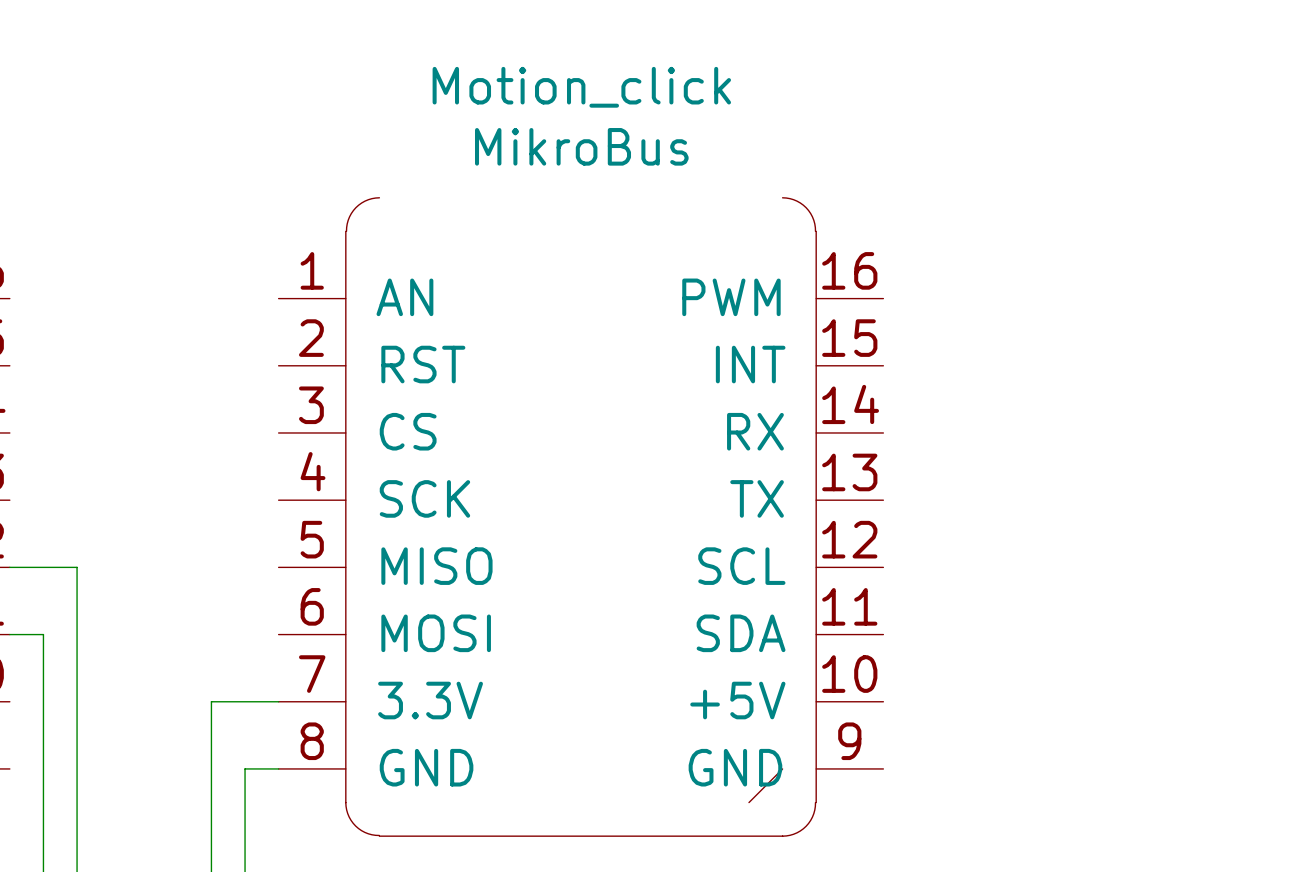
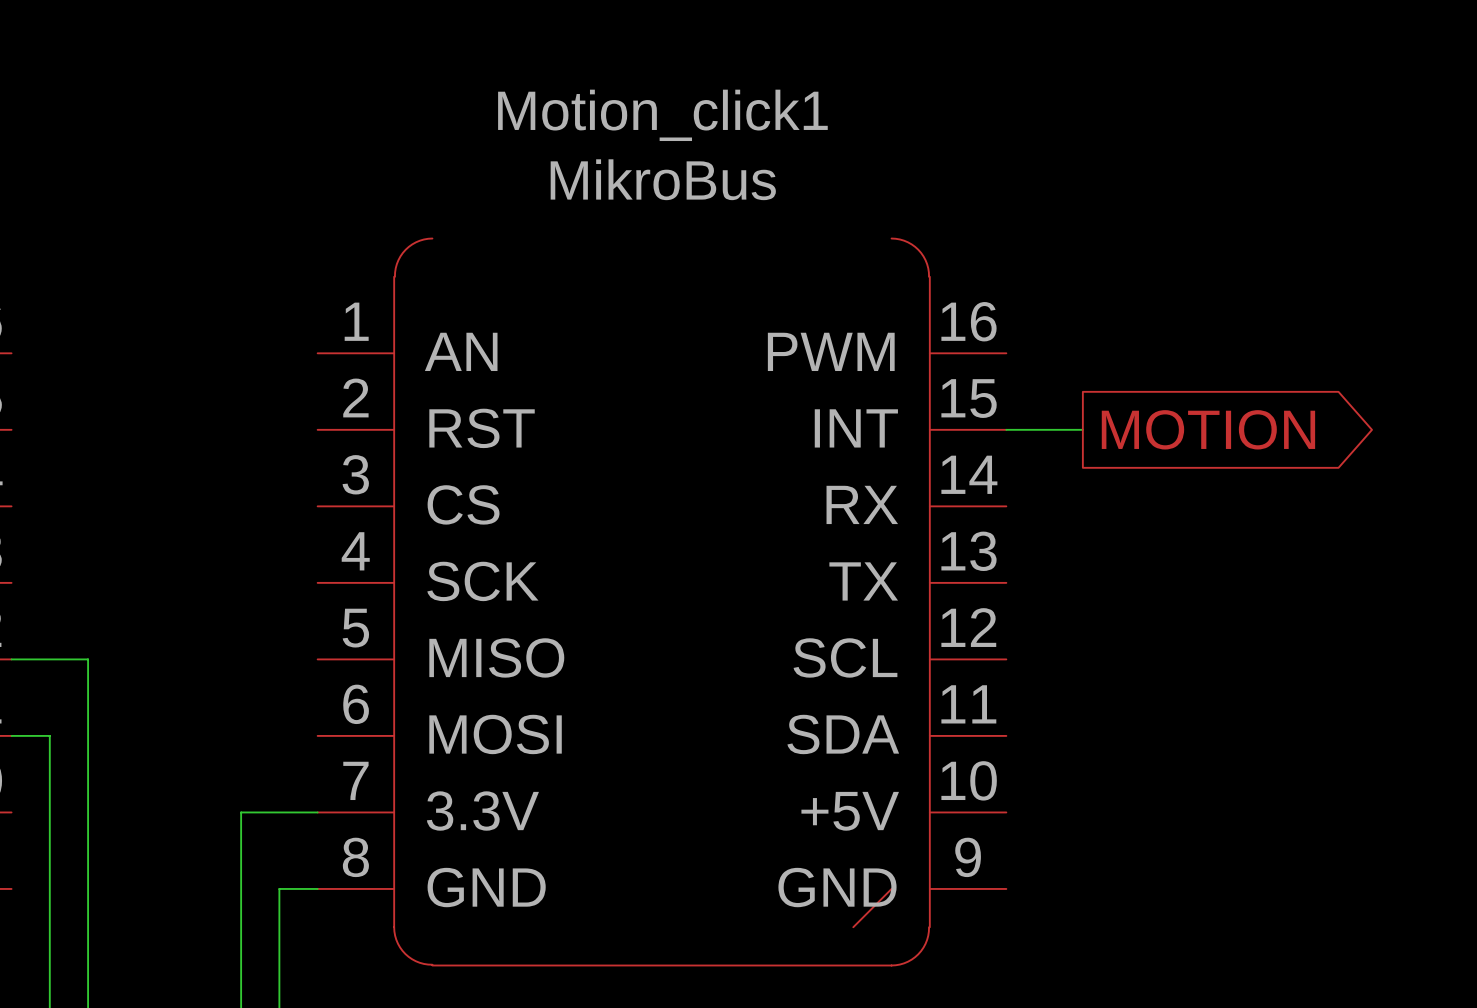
Motion_click name: Motion_click (581, 87) -> Motion_click1 (662, 115)
wire: none -> (1006, 429) (1082, 429)
global label: none -> MOTION (1208, 429)

